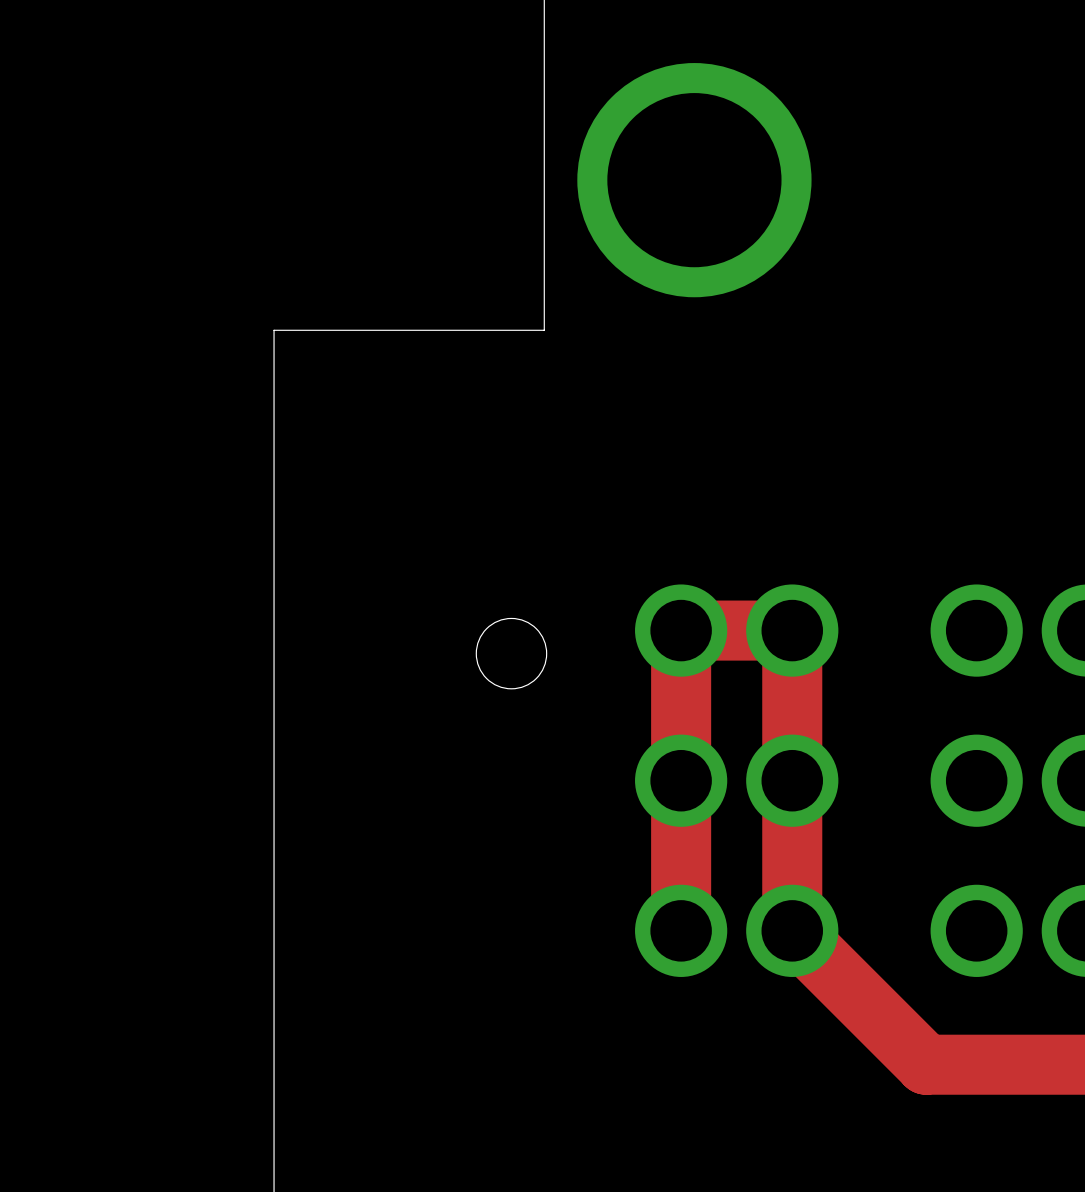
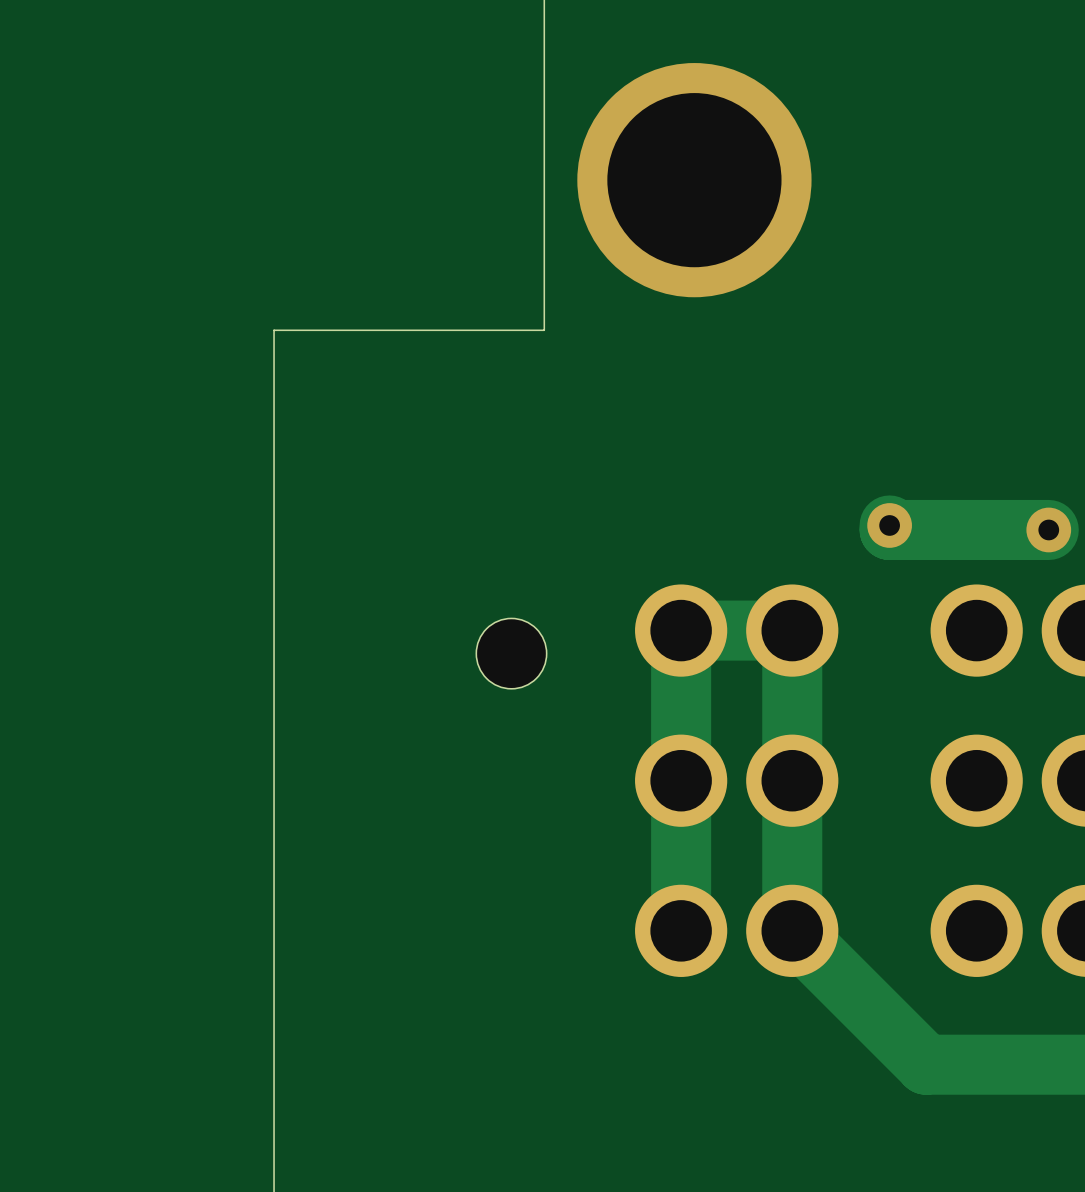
track: none -> (889, 525) (889, 529) (1048, 529)
via: none -> (889, 525)
via: none -> (1048, 529)

